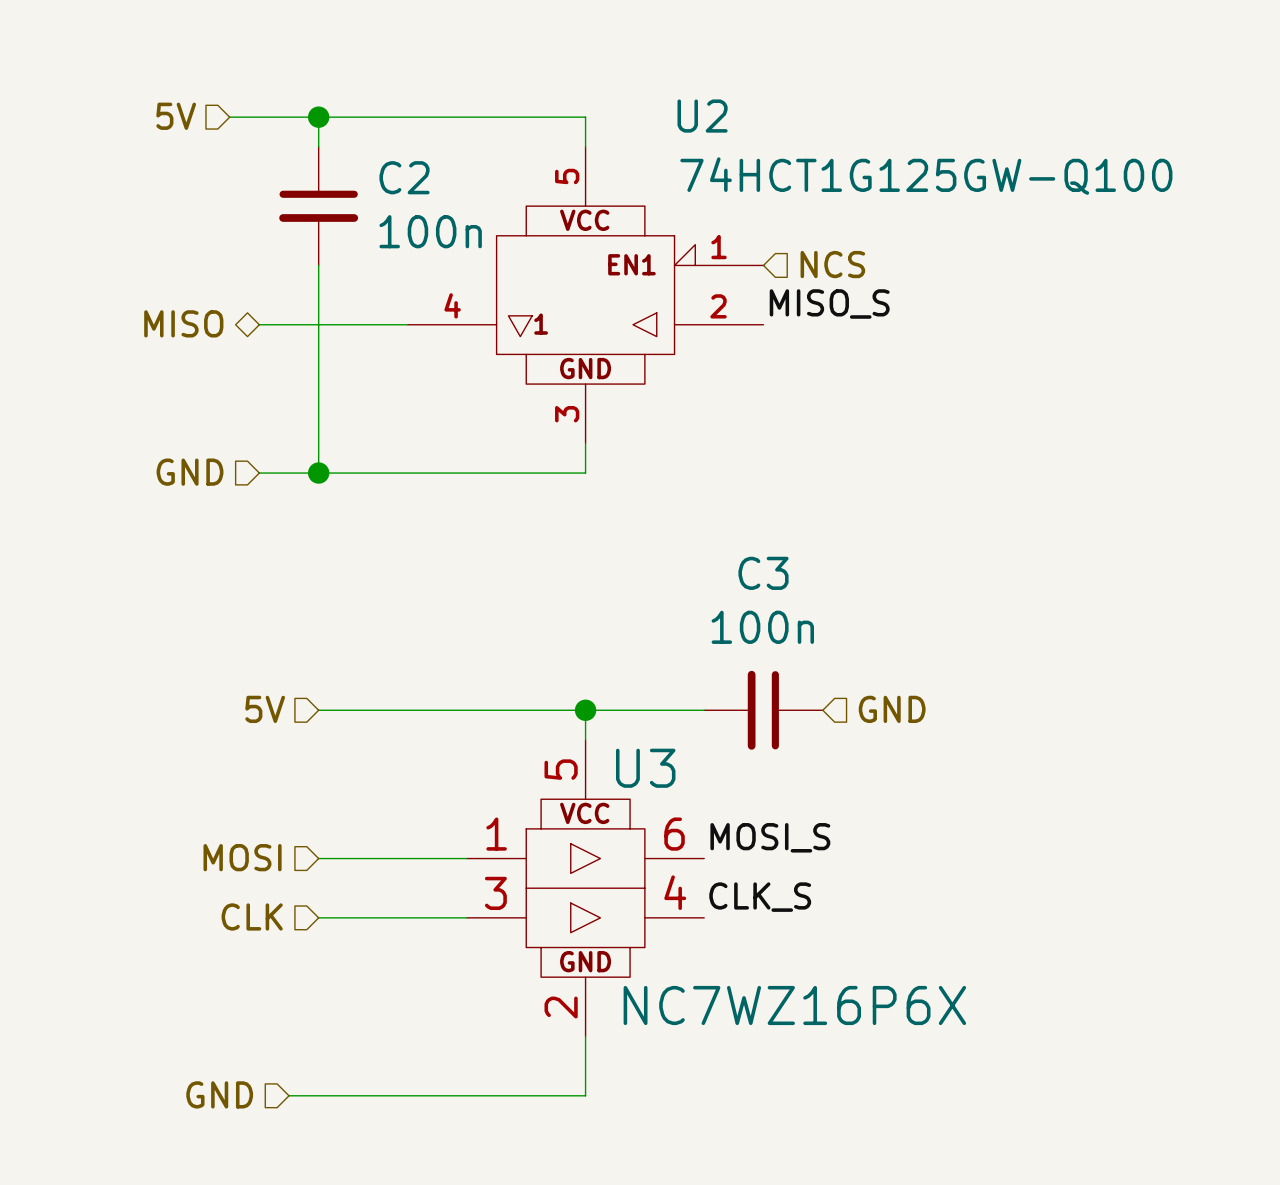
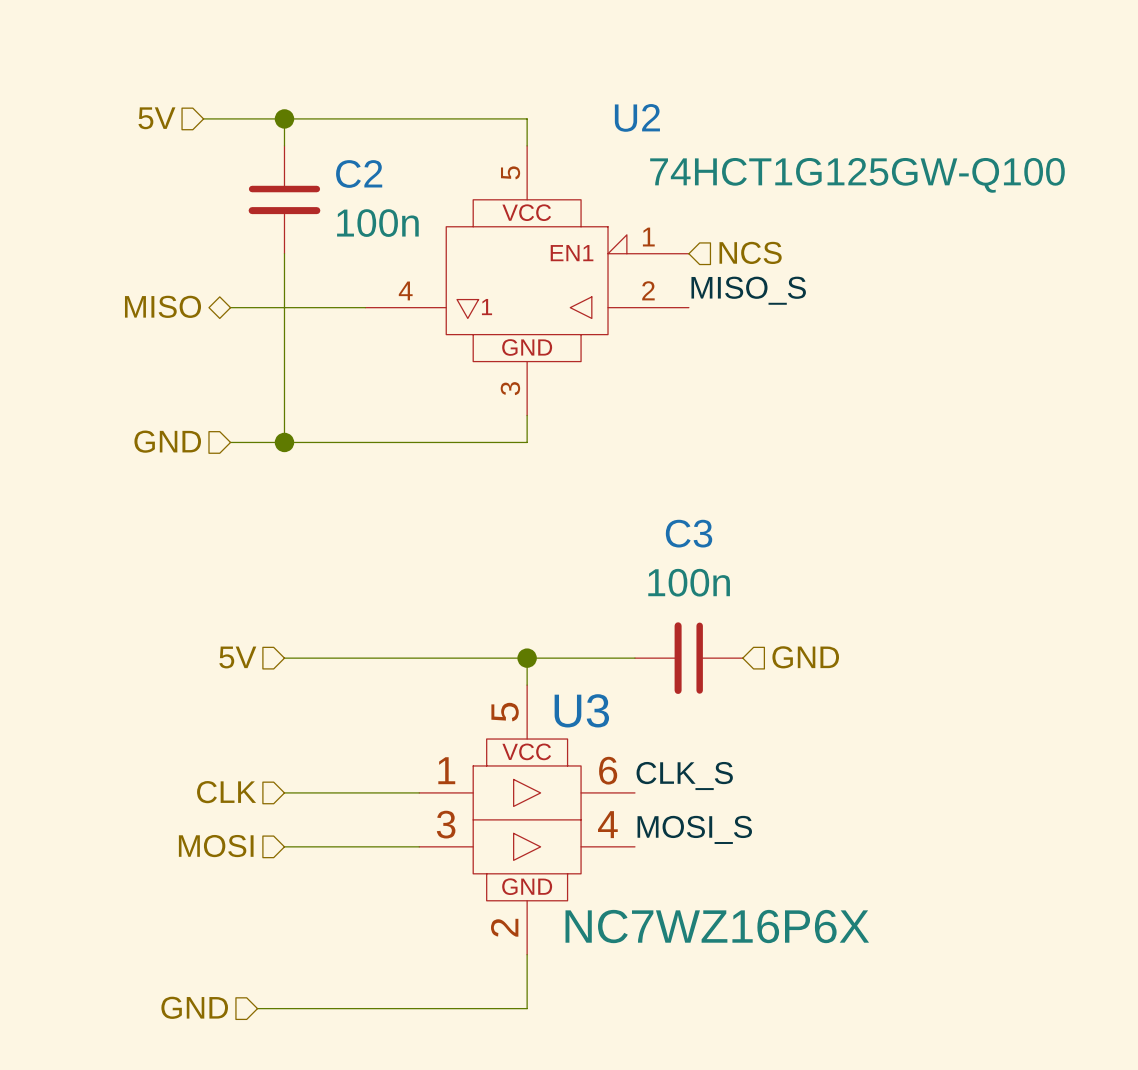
label: MOSI_S (770, 837) -> CLK_S (684, 776)
hierarchical label: MOSI (242, 857) -> CLK (226, 792)
label: CLK_S (760, 897) -> MOSI_S (694, 829)
hierarchical label: CLK (252, 916) -> MOSI (216, 846)

